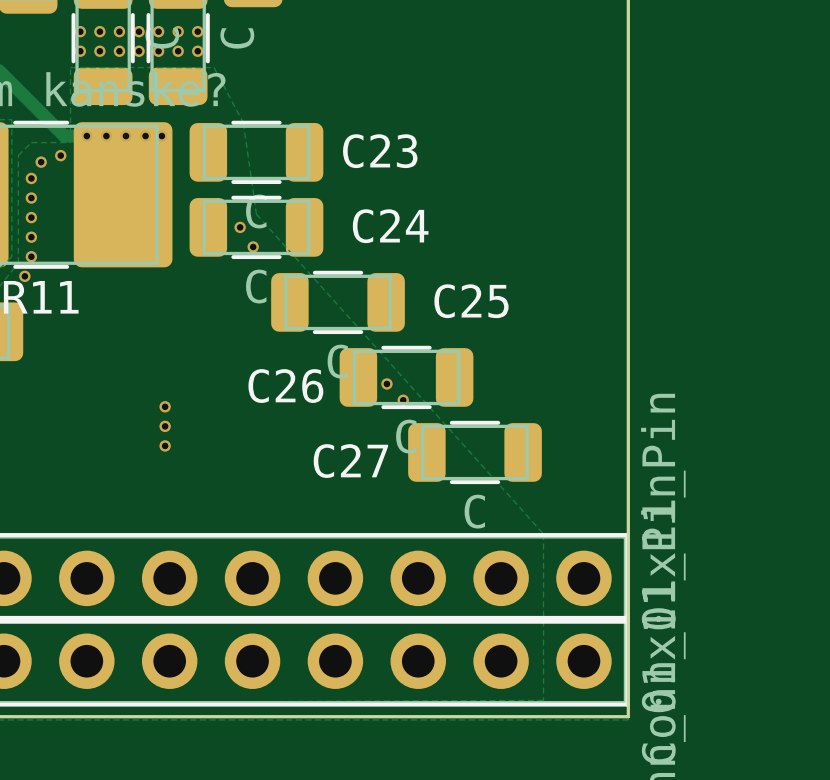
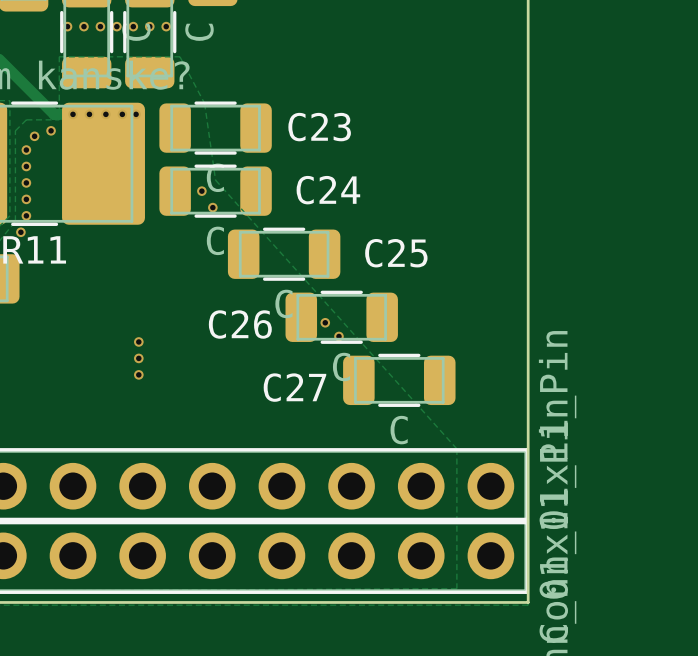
via: (80, 51) -> none
via: (99, 51) -> none
via: (119, 51) -> none
via: (139, 51) -> none
via: (158, 51) -> none
via: (178, 51) -> none
via: (197, 51) -> none

